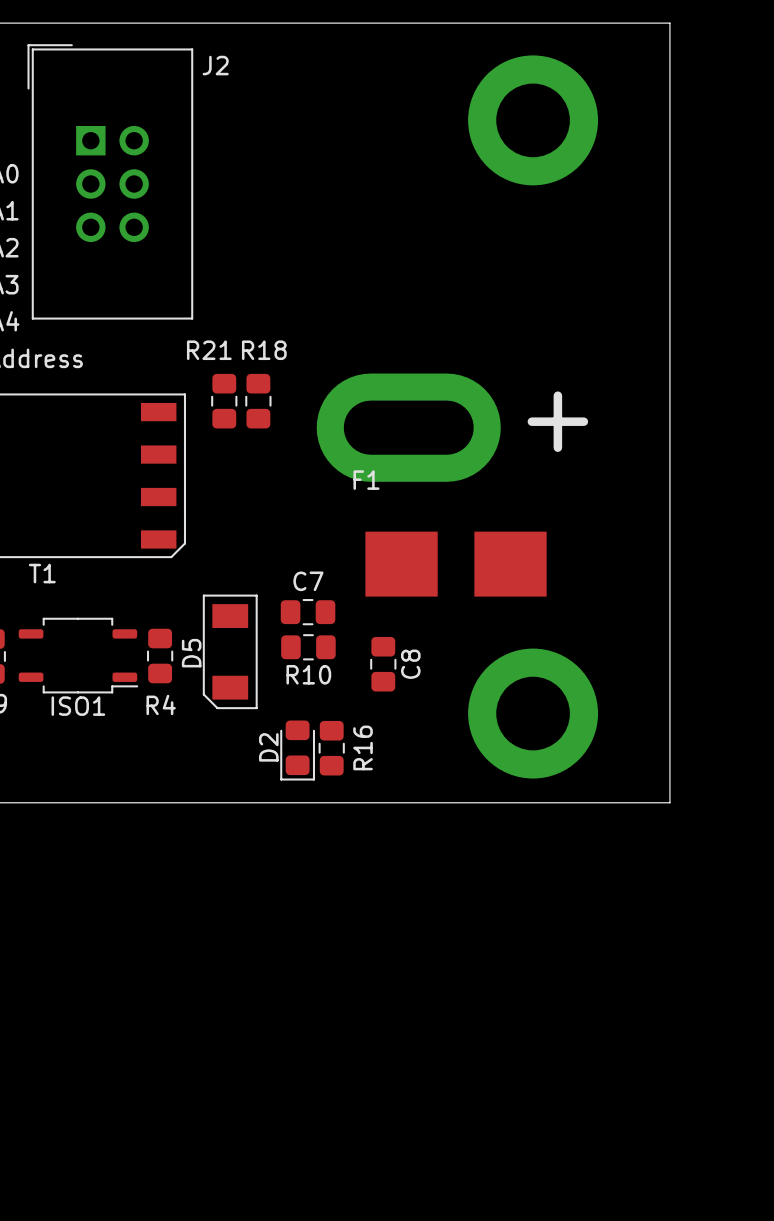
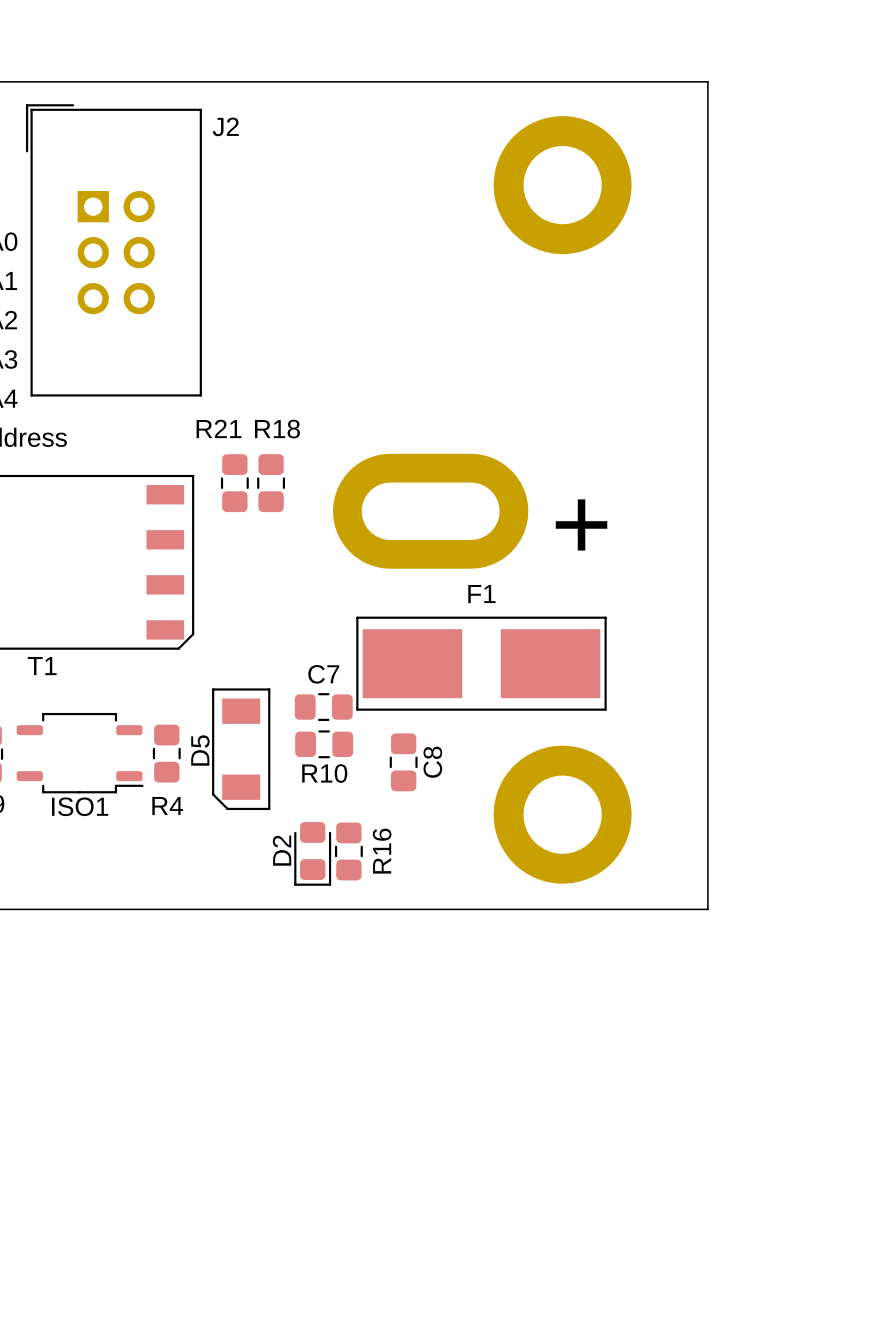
F1 name position: F1 (366, 480) -> F1 (481, 594)
F1 footprint: [365, 531, 547, 597] -> [356, 616, 607, 711]

